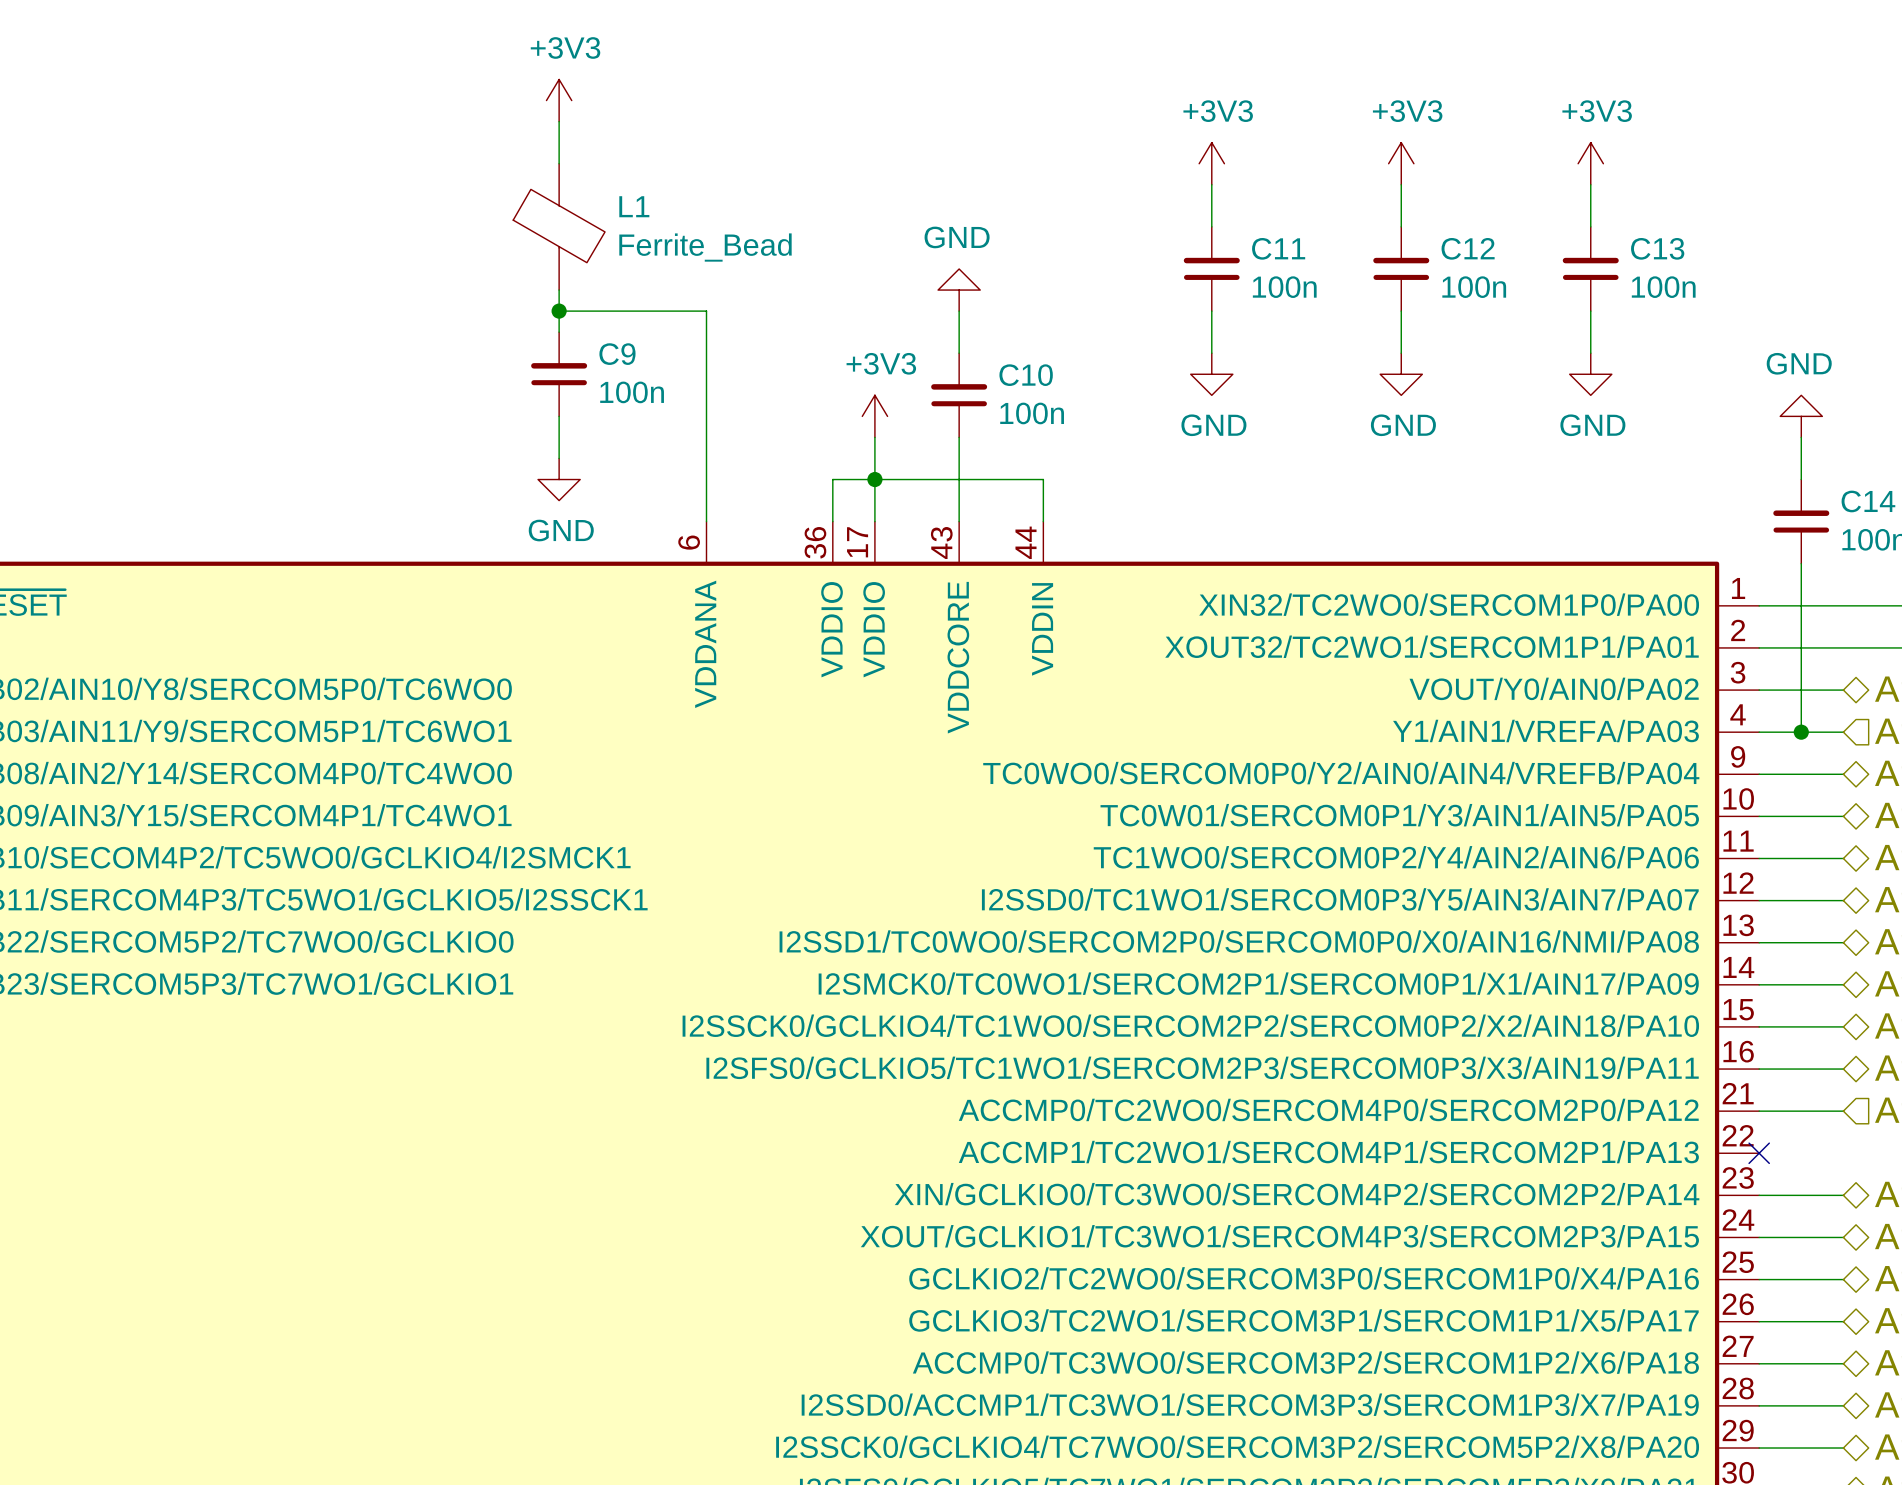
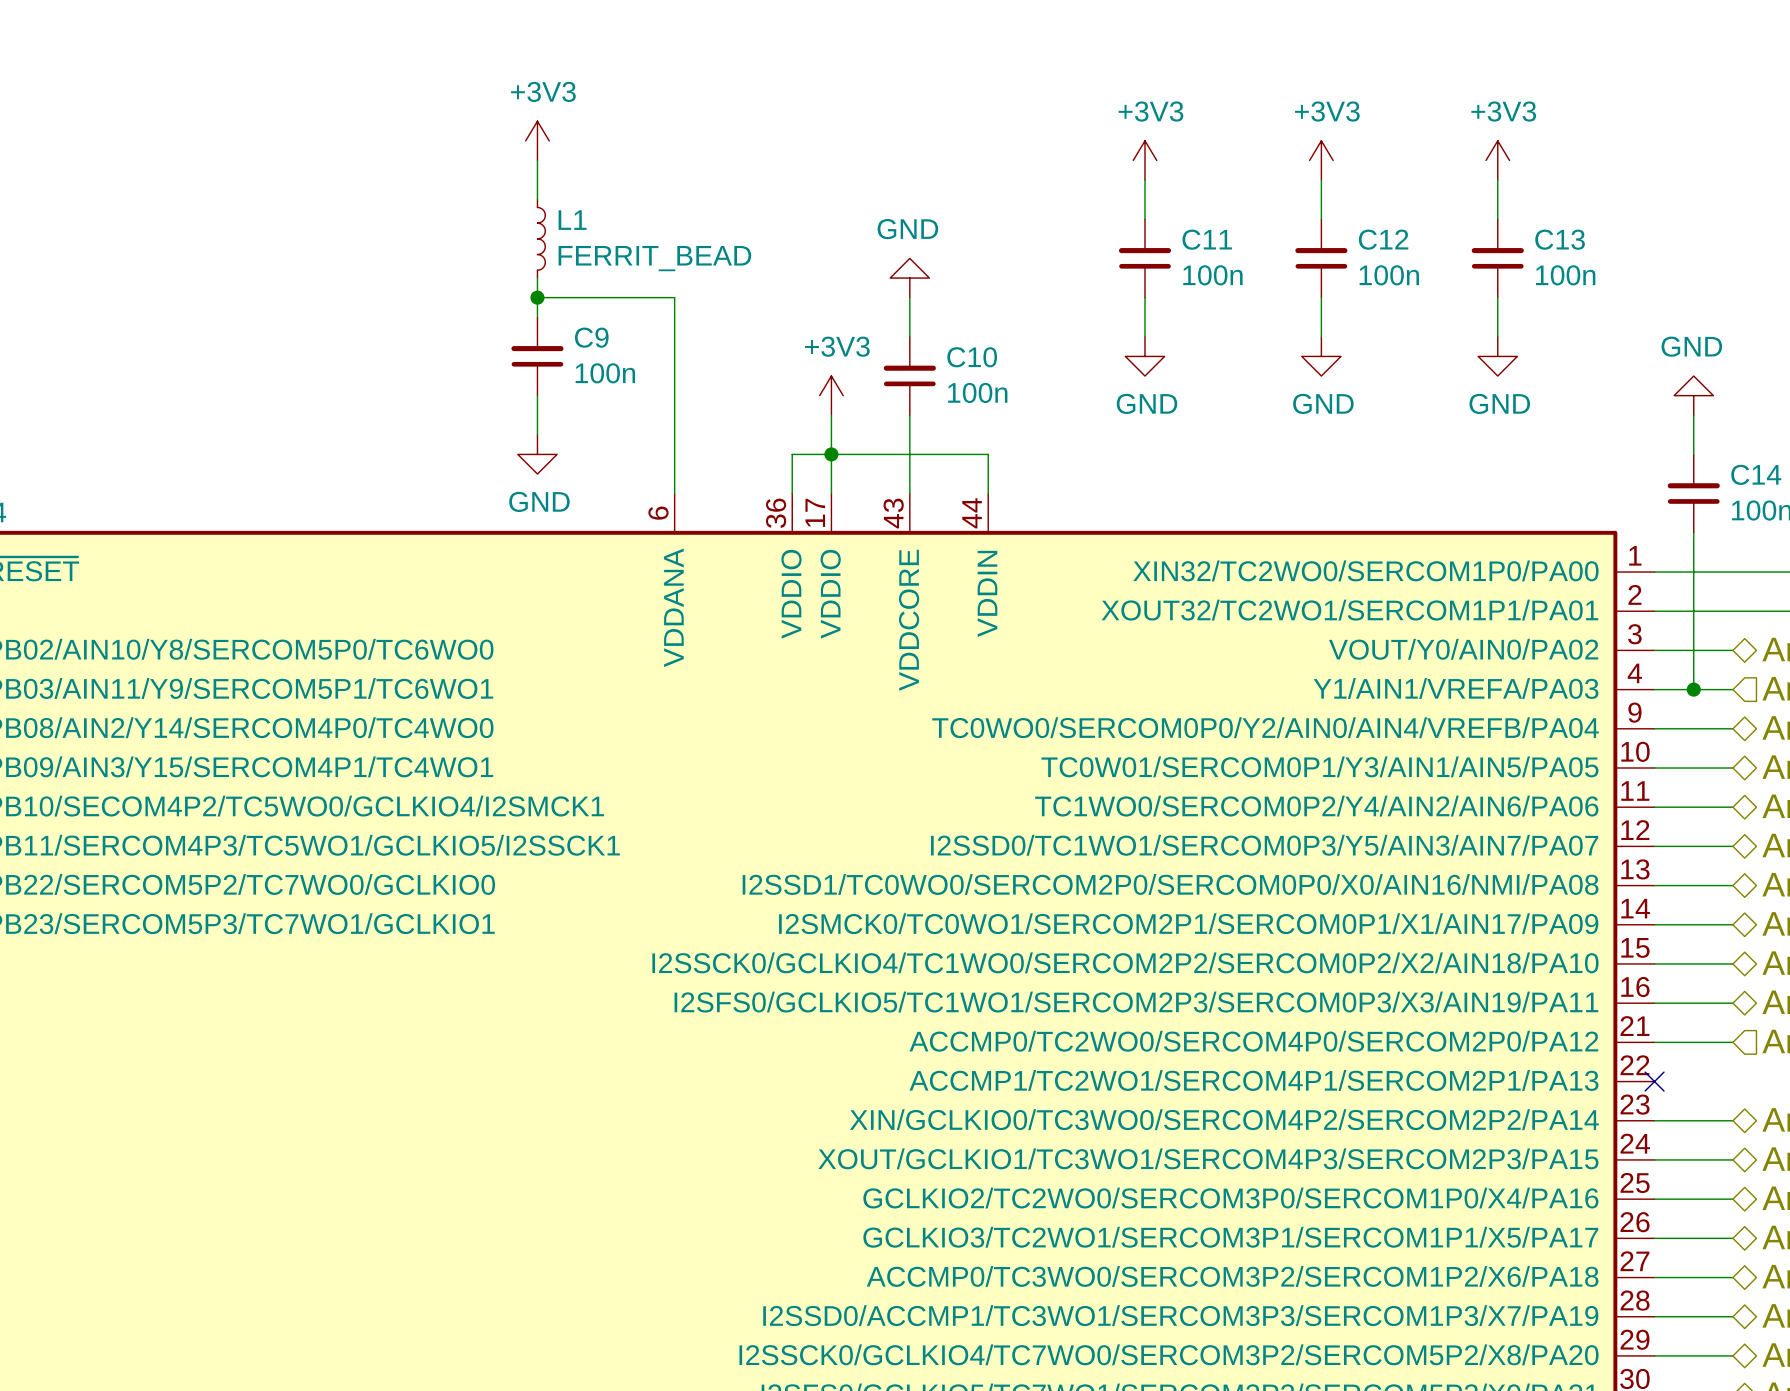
power symbol position: +3V3 (559, 100) -> +3V3 (537, 140)
L1 symbol: [513, 163, 606, 291] -> [537, 199, 546, 279]
L1 name position: L1 (634, 206) -> L1 (572, 220)
L1 value: Ferrite_Bead (705, 247) -> FERRIT_BEAD (654, 258)

